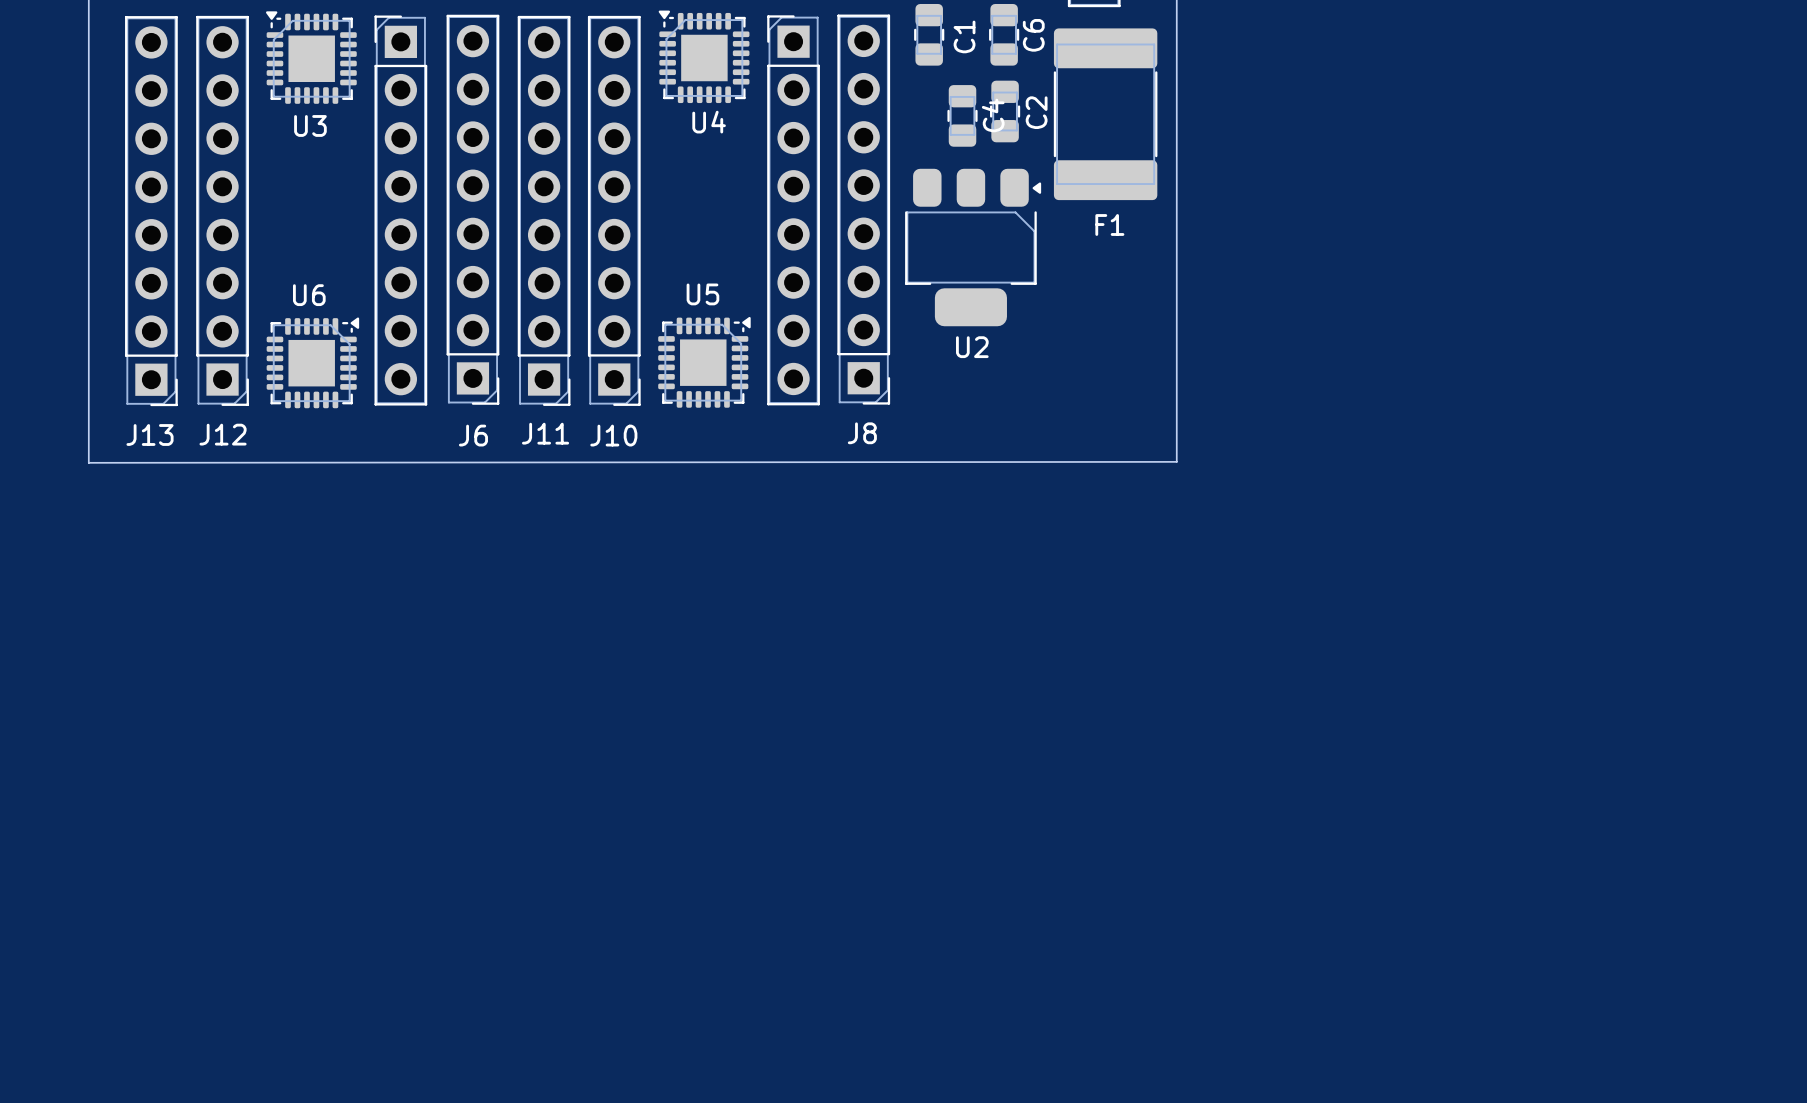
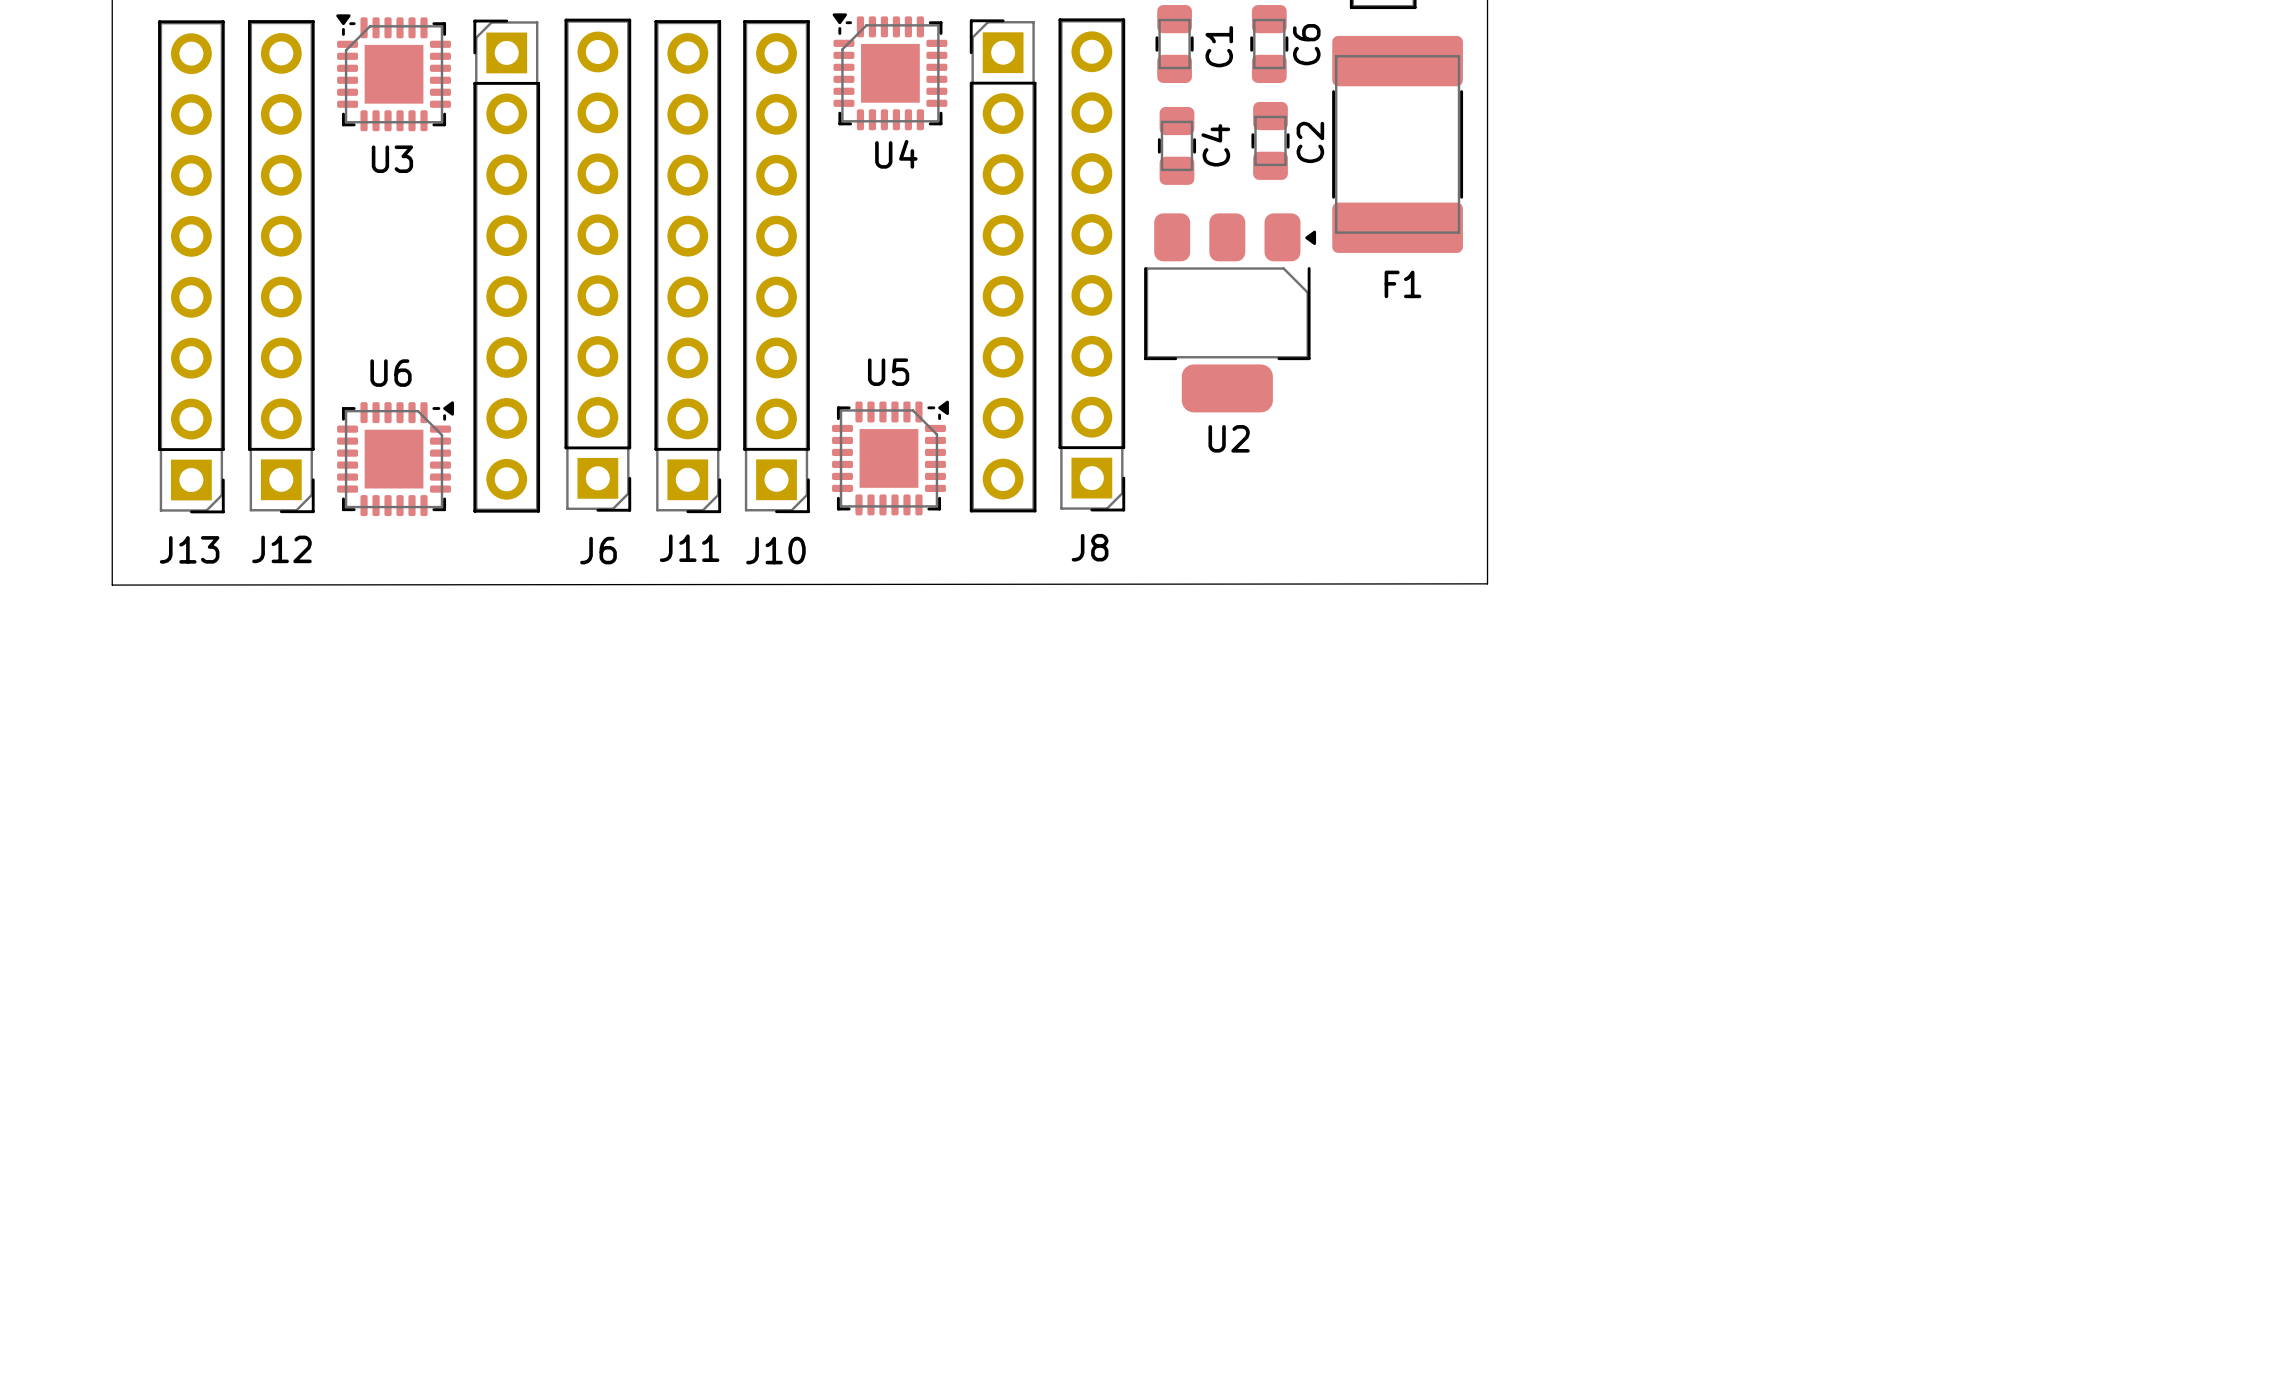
C4 position: (962, 115) -> (1176, 145)

